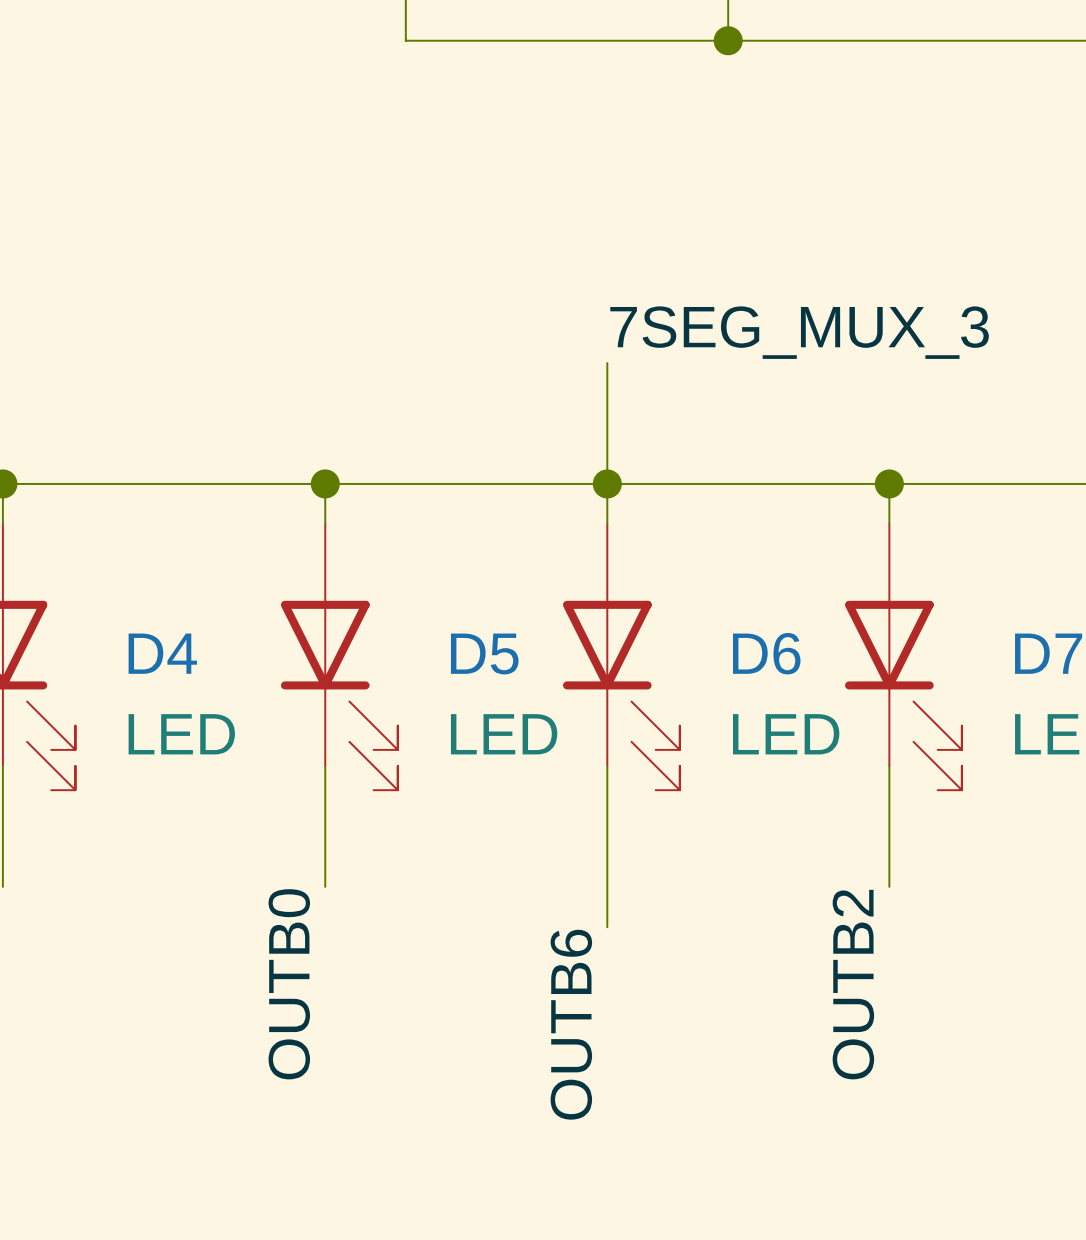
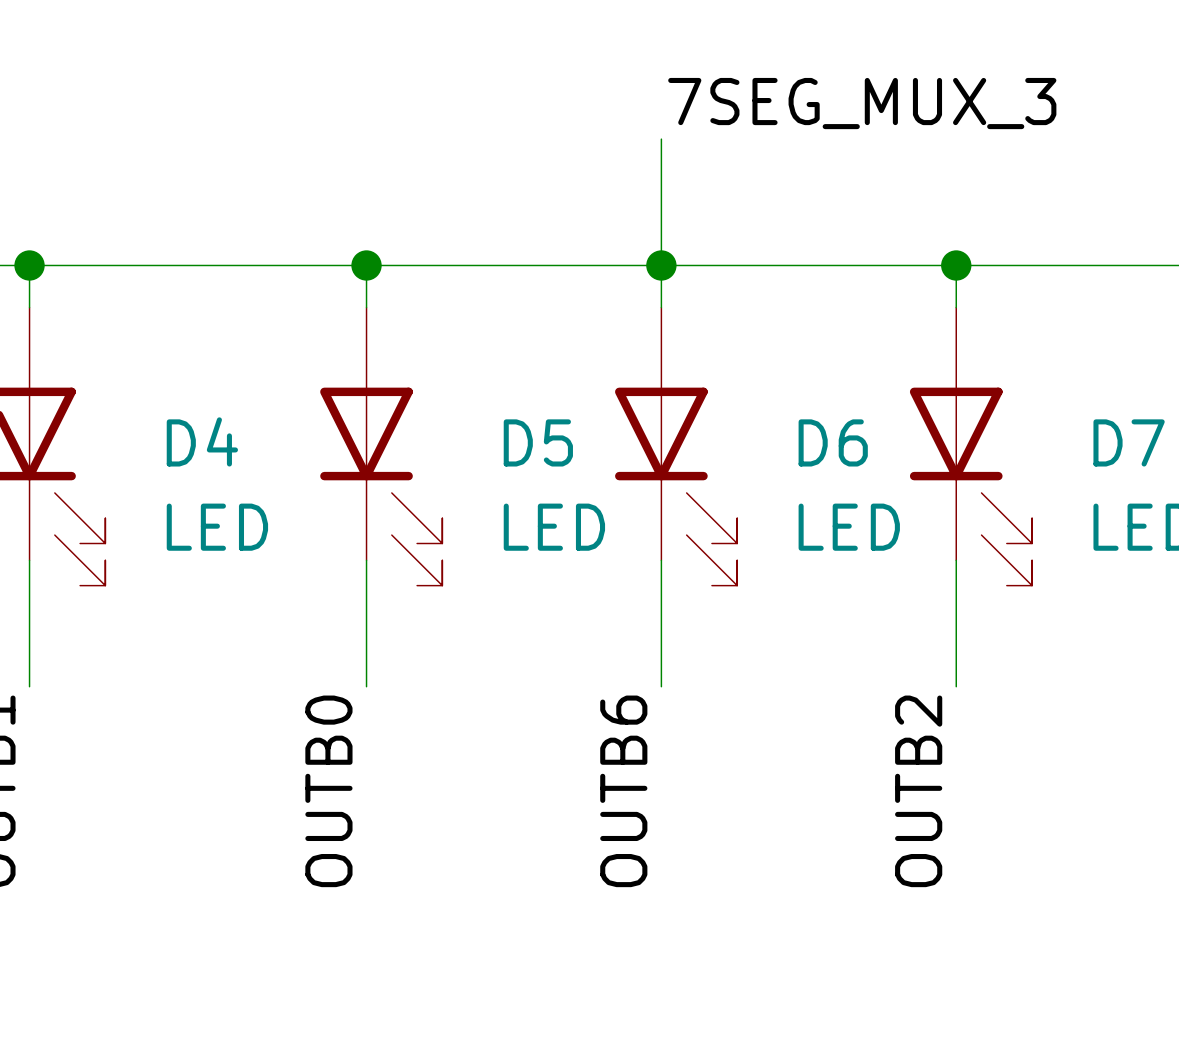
wire: (607, 886) (607, 927) -> none
label position: OUTB6 (571, 1024) -> OUTB6 (623, 791)

